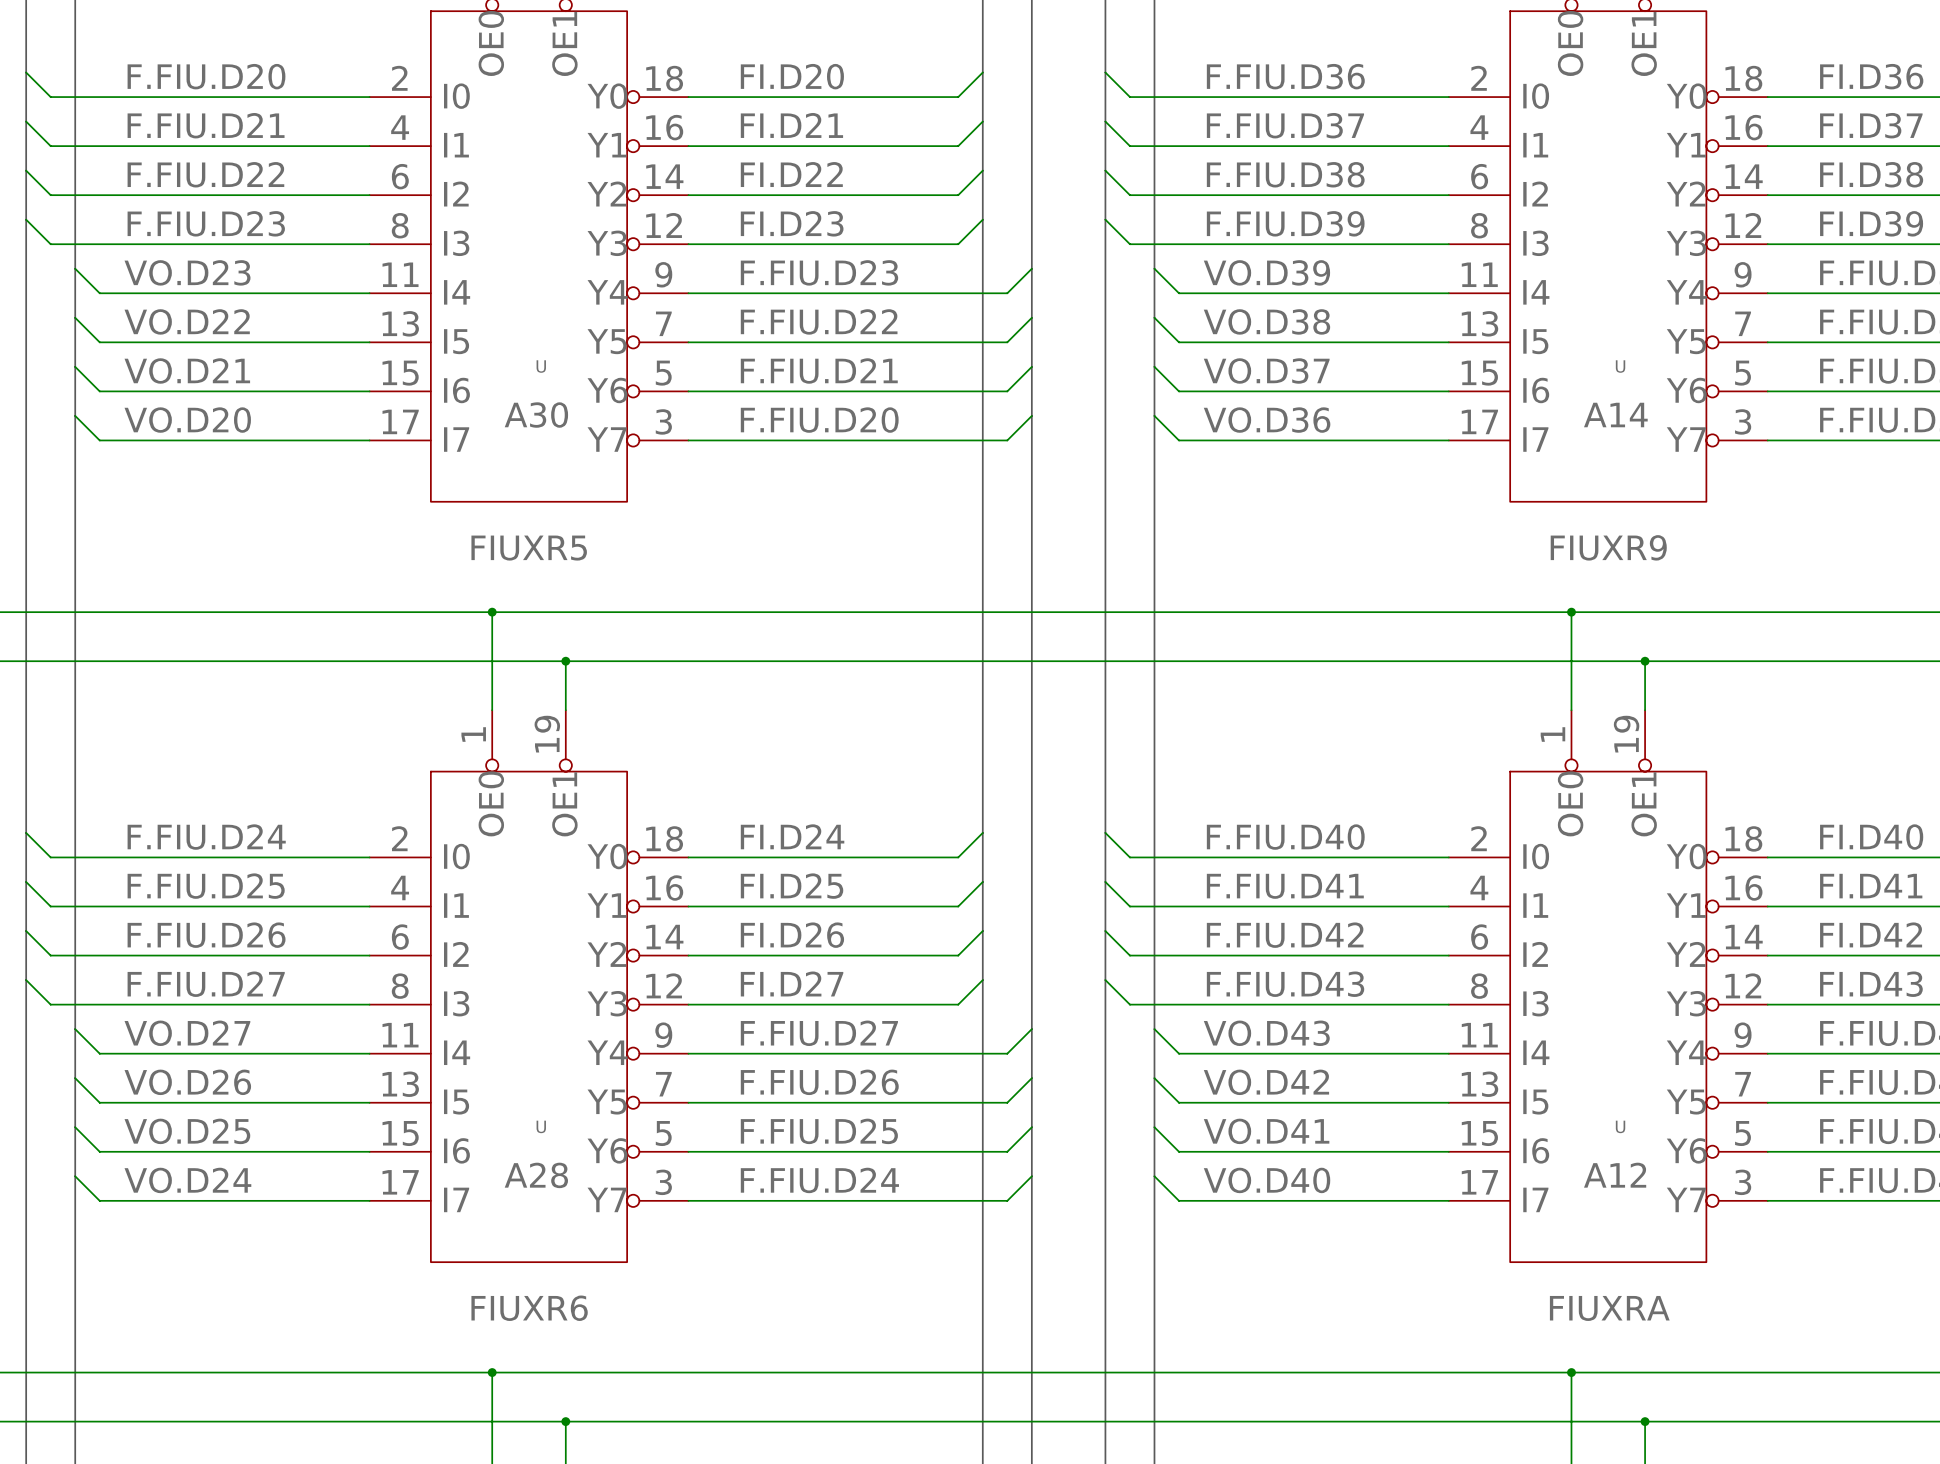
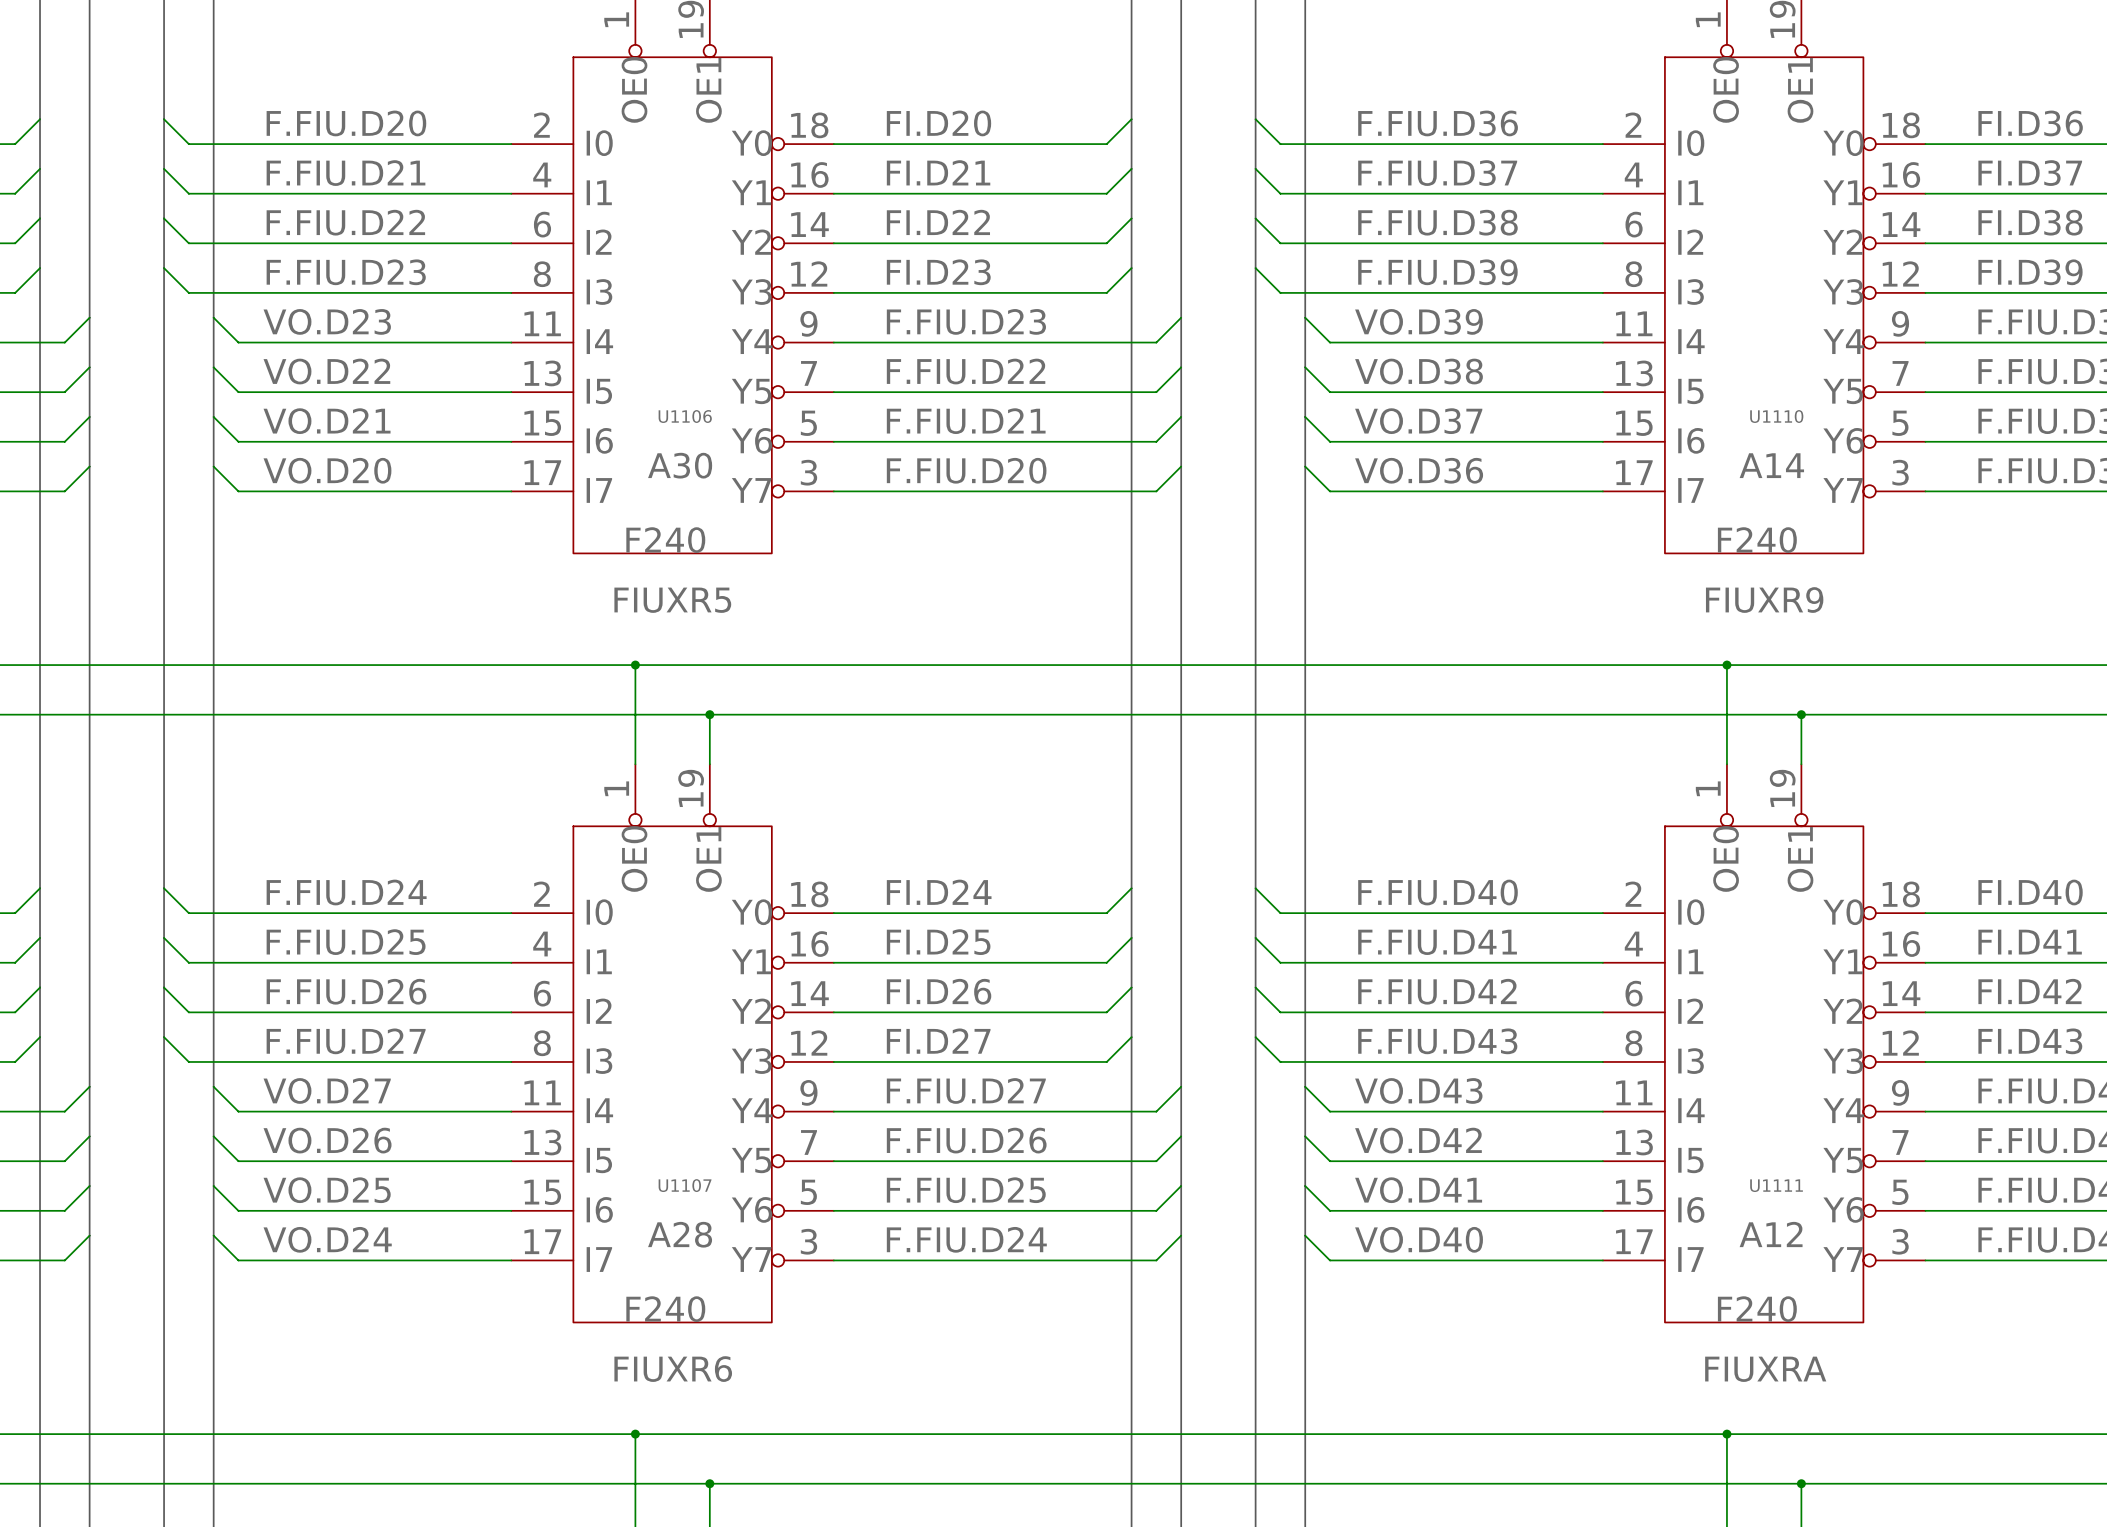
U name: U (541, 366) -> U1106 (685, 416)
U name: U (1620, 366) -> U1110 (1776, 416)
U value: none -> F240 (665, 540)
U value: none -> F240 (1757, 540)
U name: U (541, 1126) -> U1107 (685, 1185)
U name: U (1620, 1126) -> U1111 (1776, 1185)
U value: none -> F240 (665, 1309)
U value: none -> F240 (1757, 1309)

